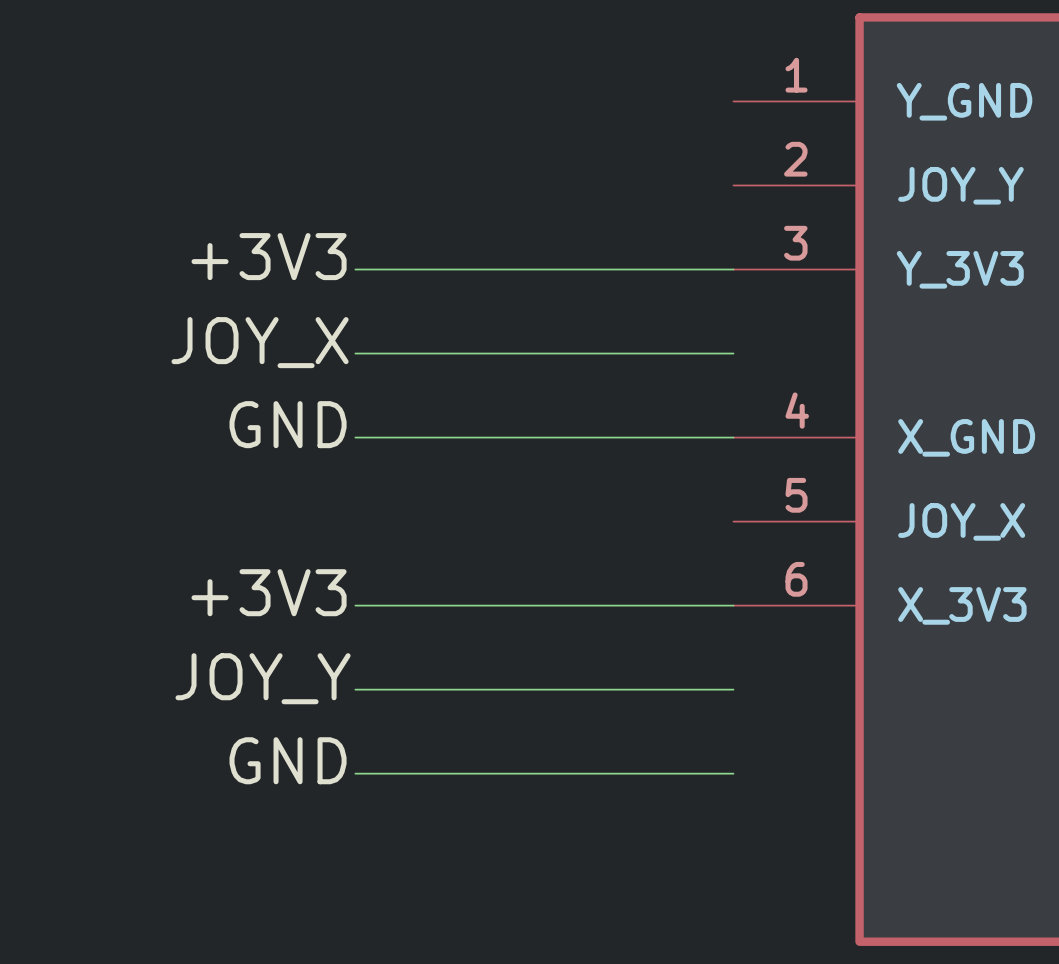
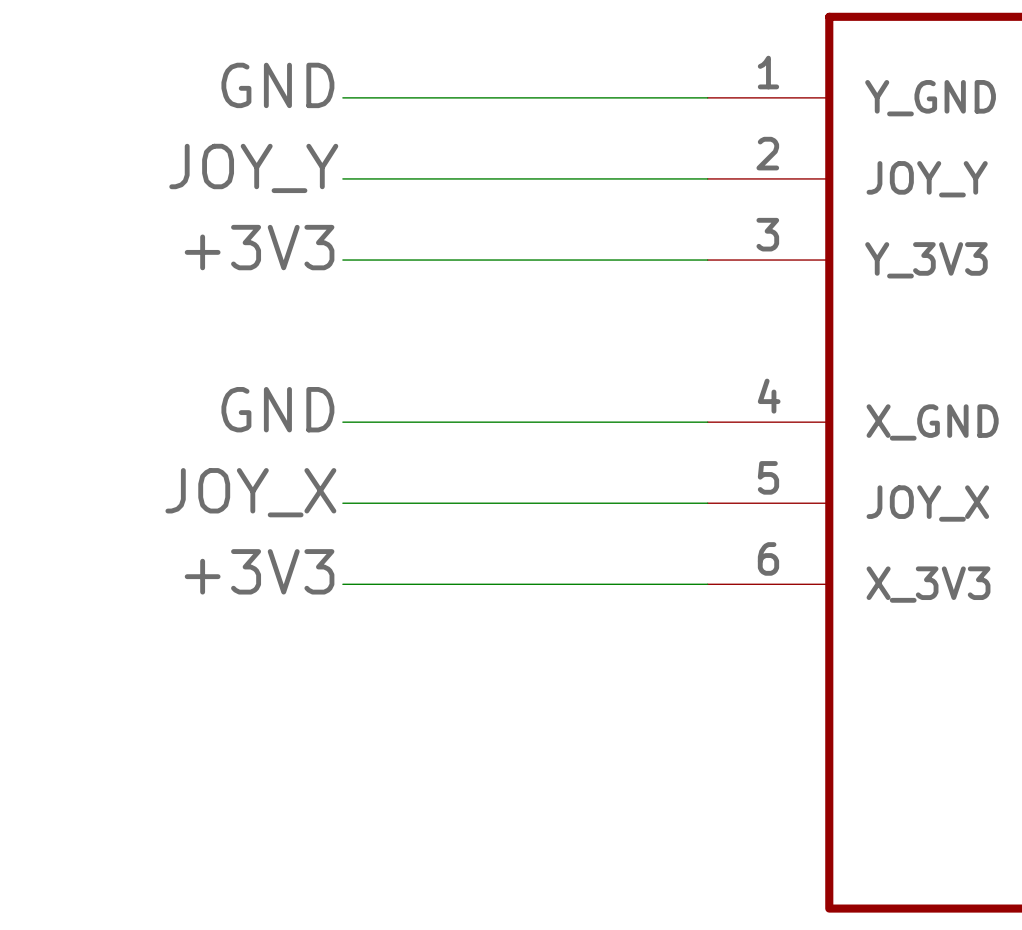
label position: JOY_X (260, 342) -> JOY_X (250, 492)
wire: (355, 353) (733, 353) -> (342, 178) (707, 178)
label position: JOY_Y (263, 678) -> JOY_Y (253, 168)
wire: (355, 689) (733, 689) -> (342, 503) (707, 503)
label position: GND (288, 760) -> GND (277, 85)
wire: (355, 773) (733, 773) -> (342, 97) (707, 97)

